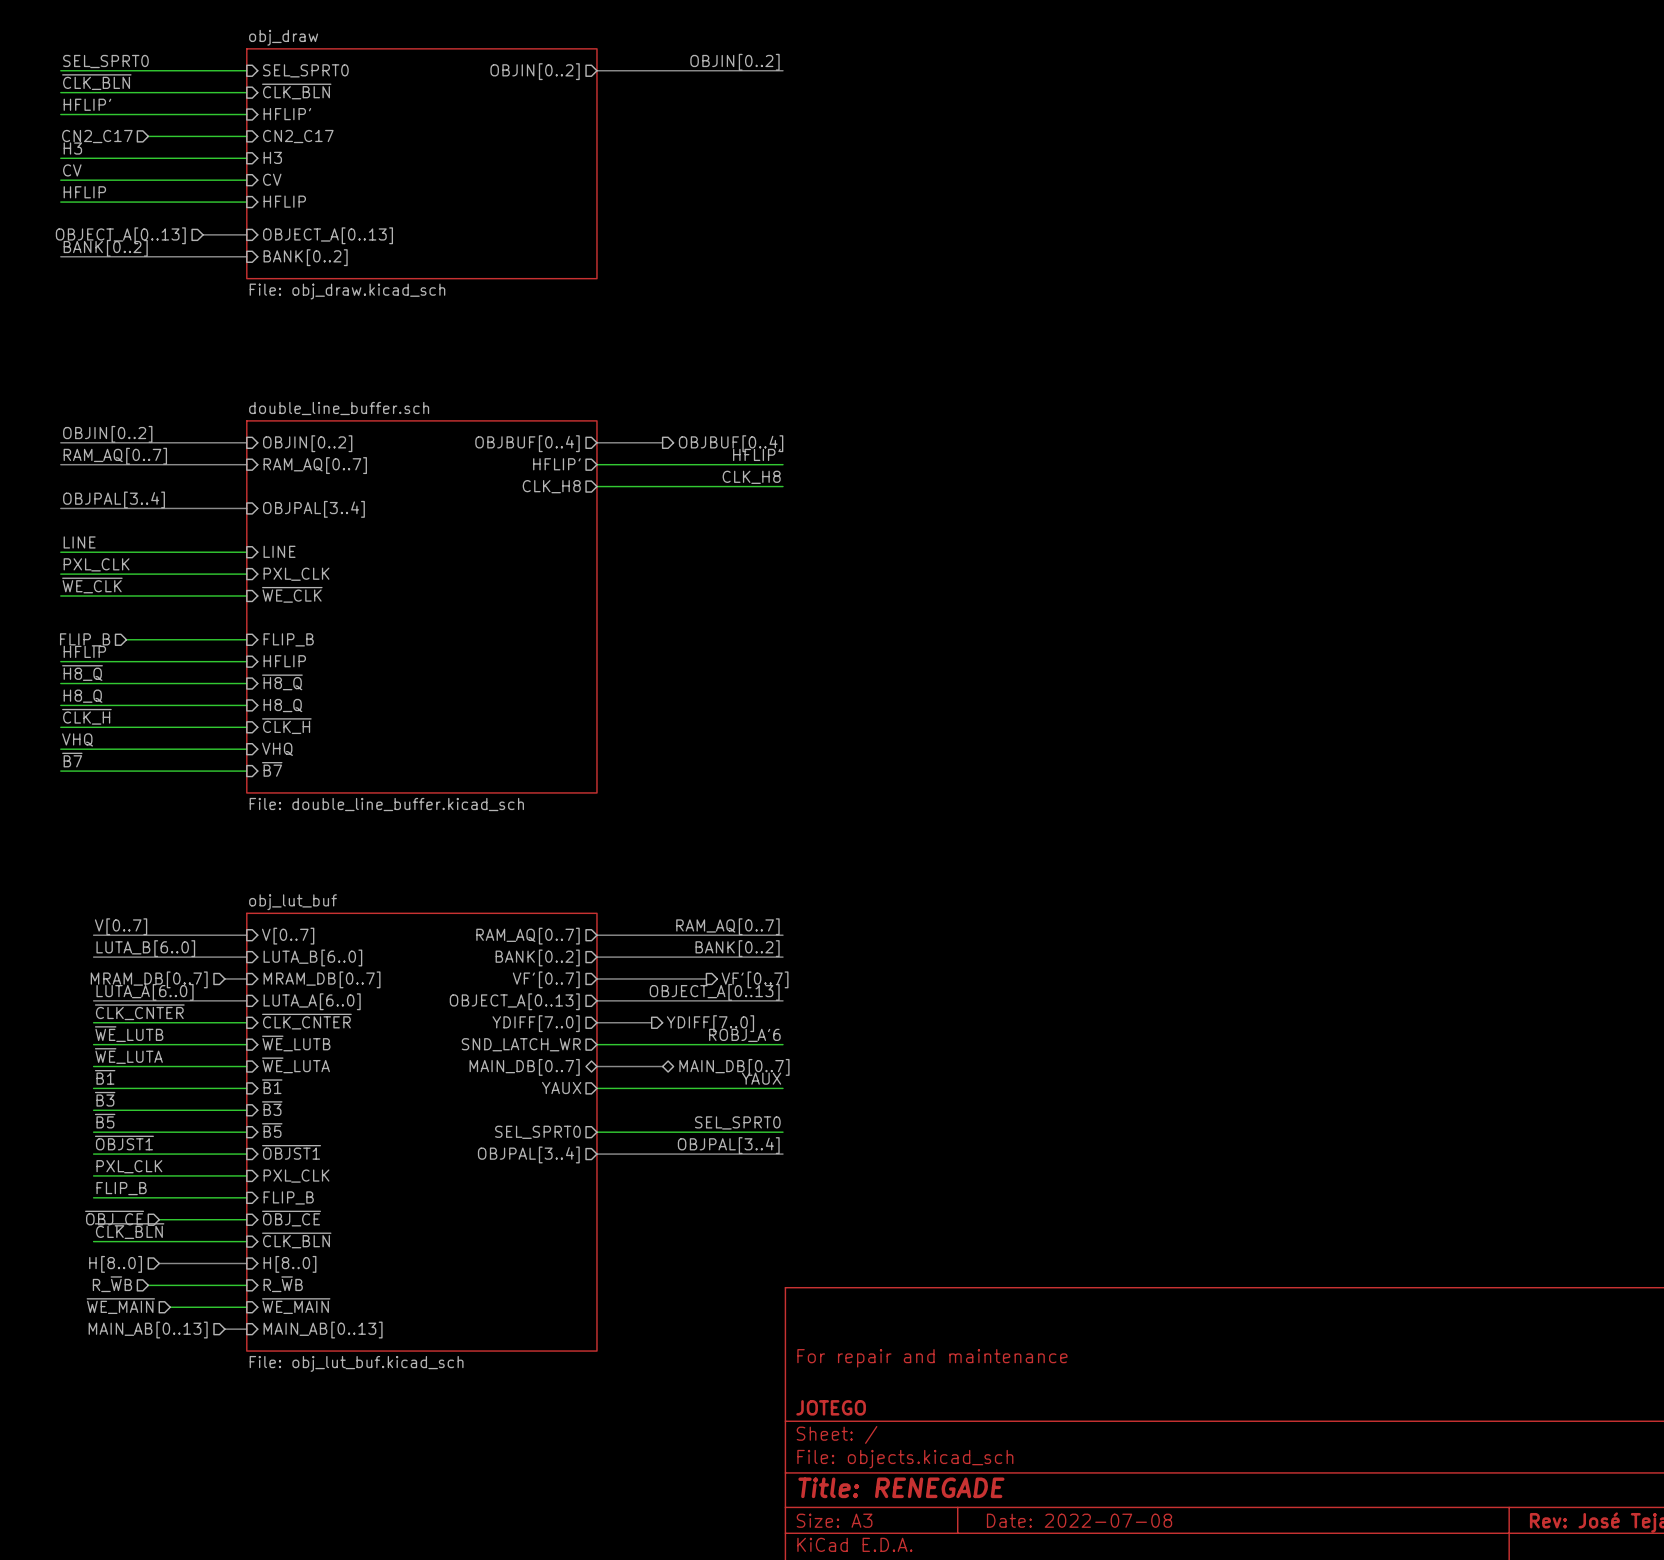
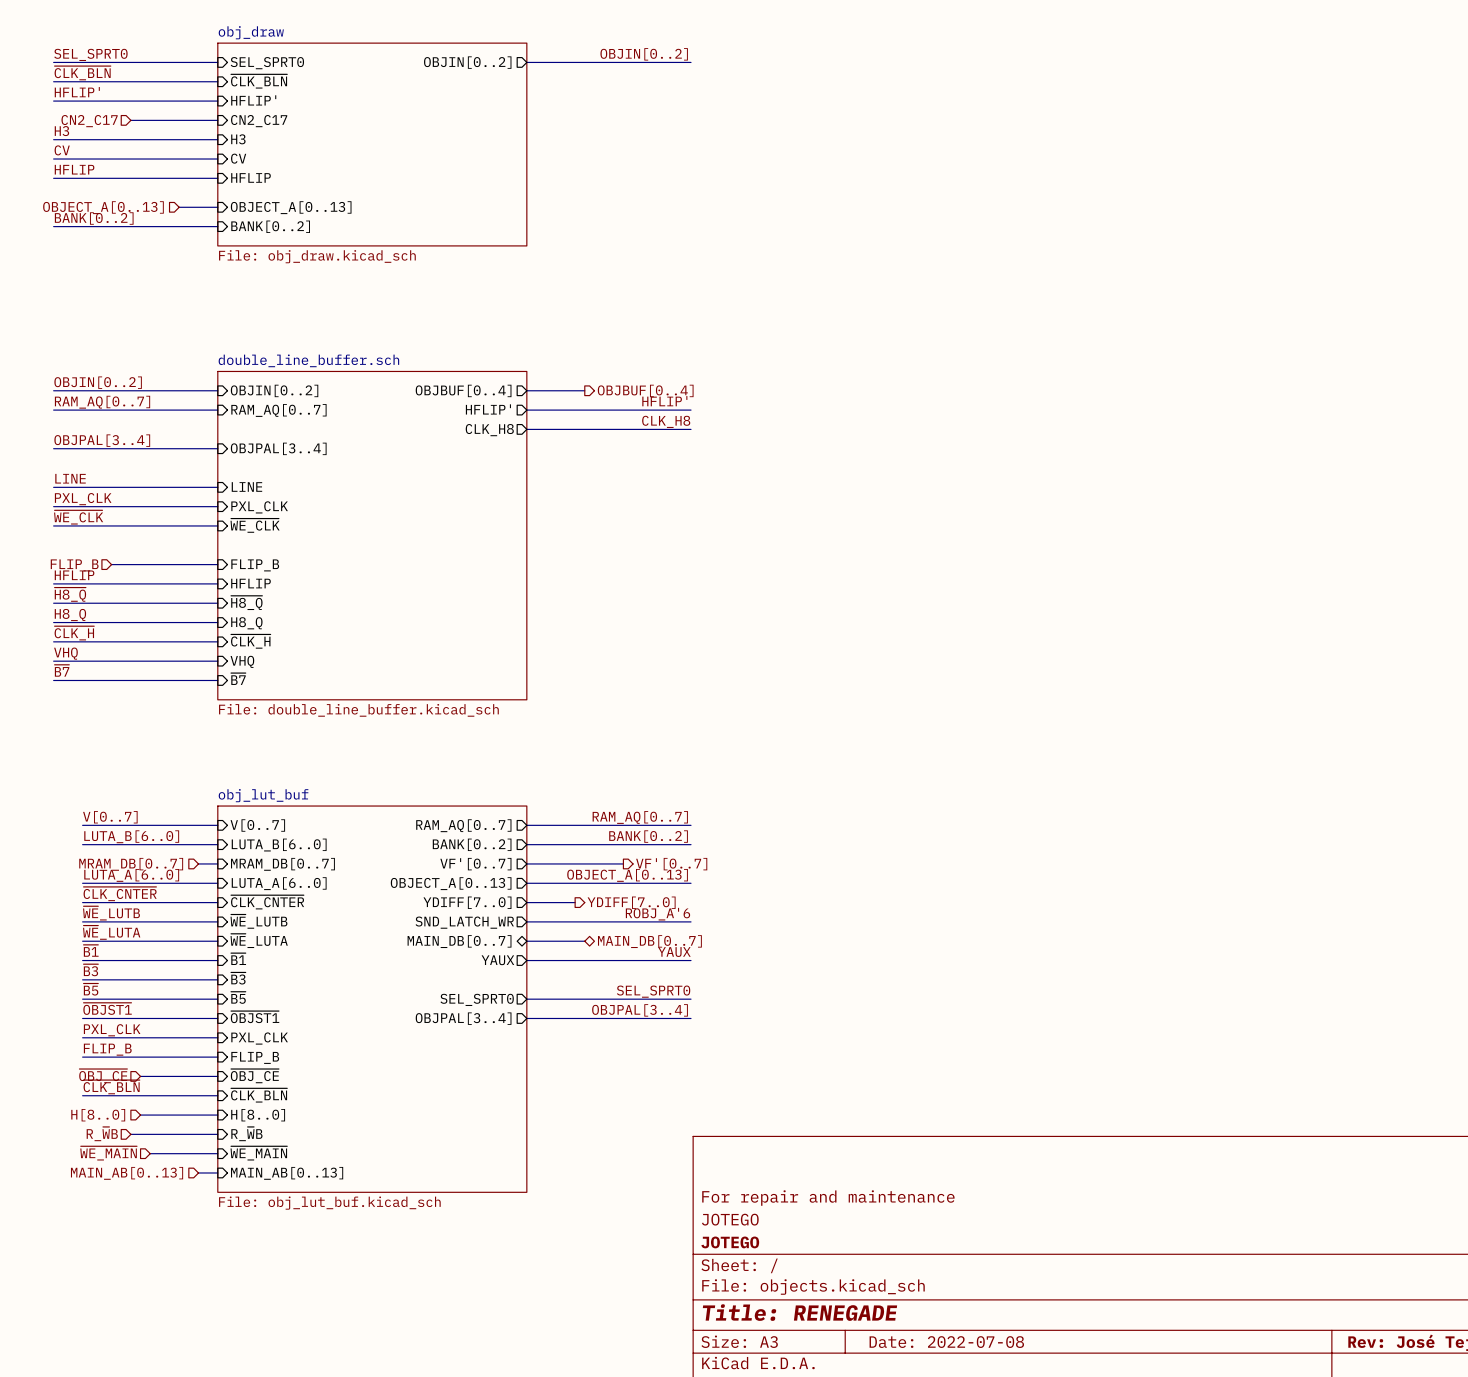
title block: none -> JOTEGO (730, 1219)

